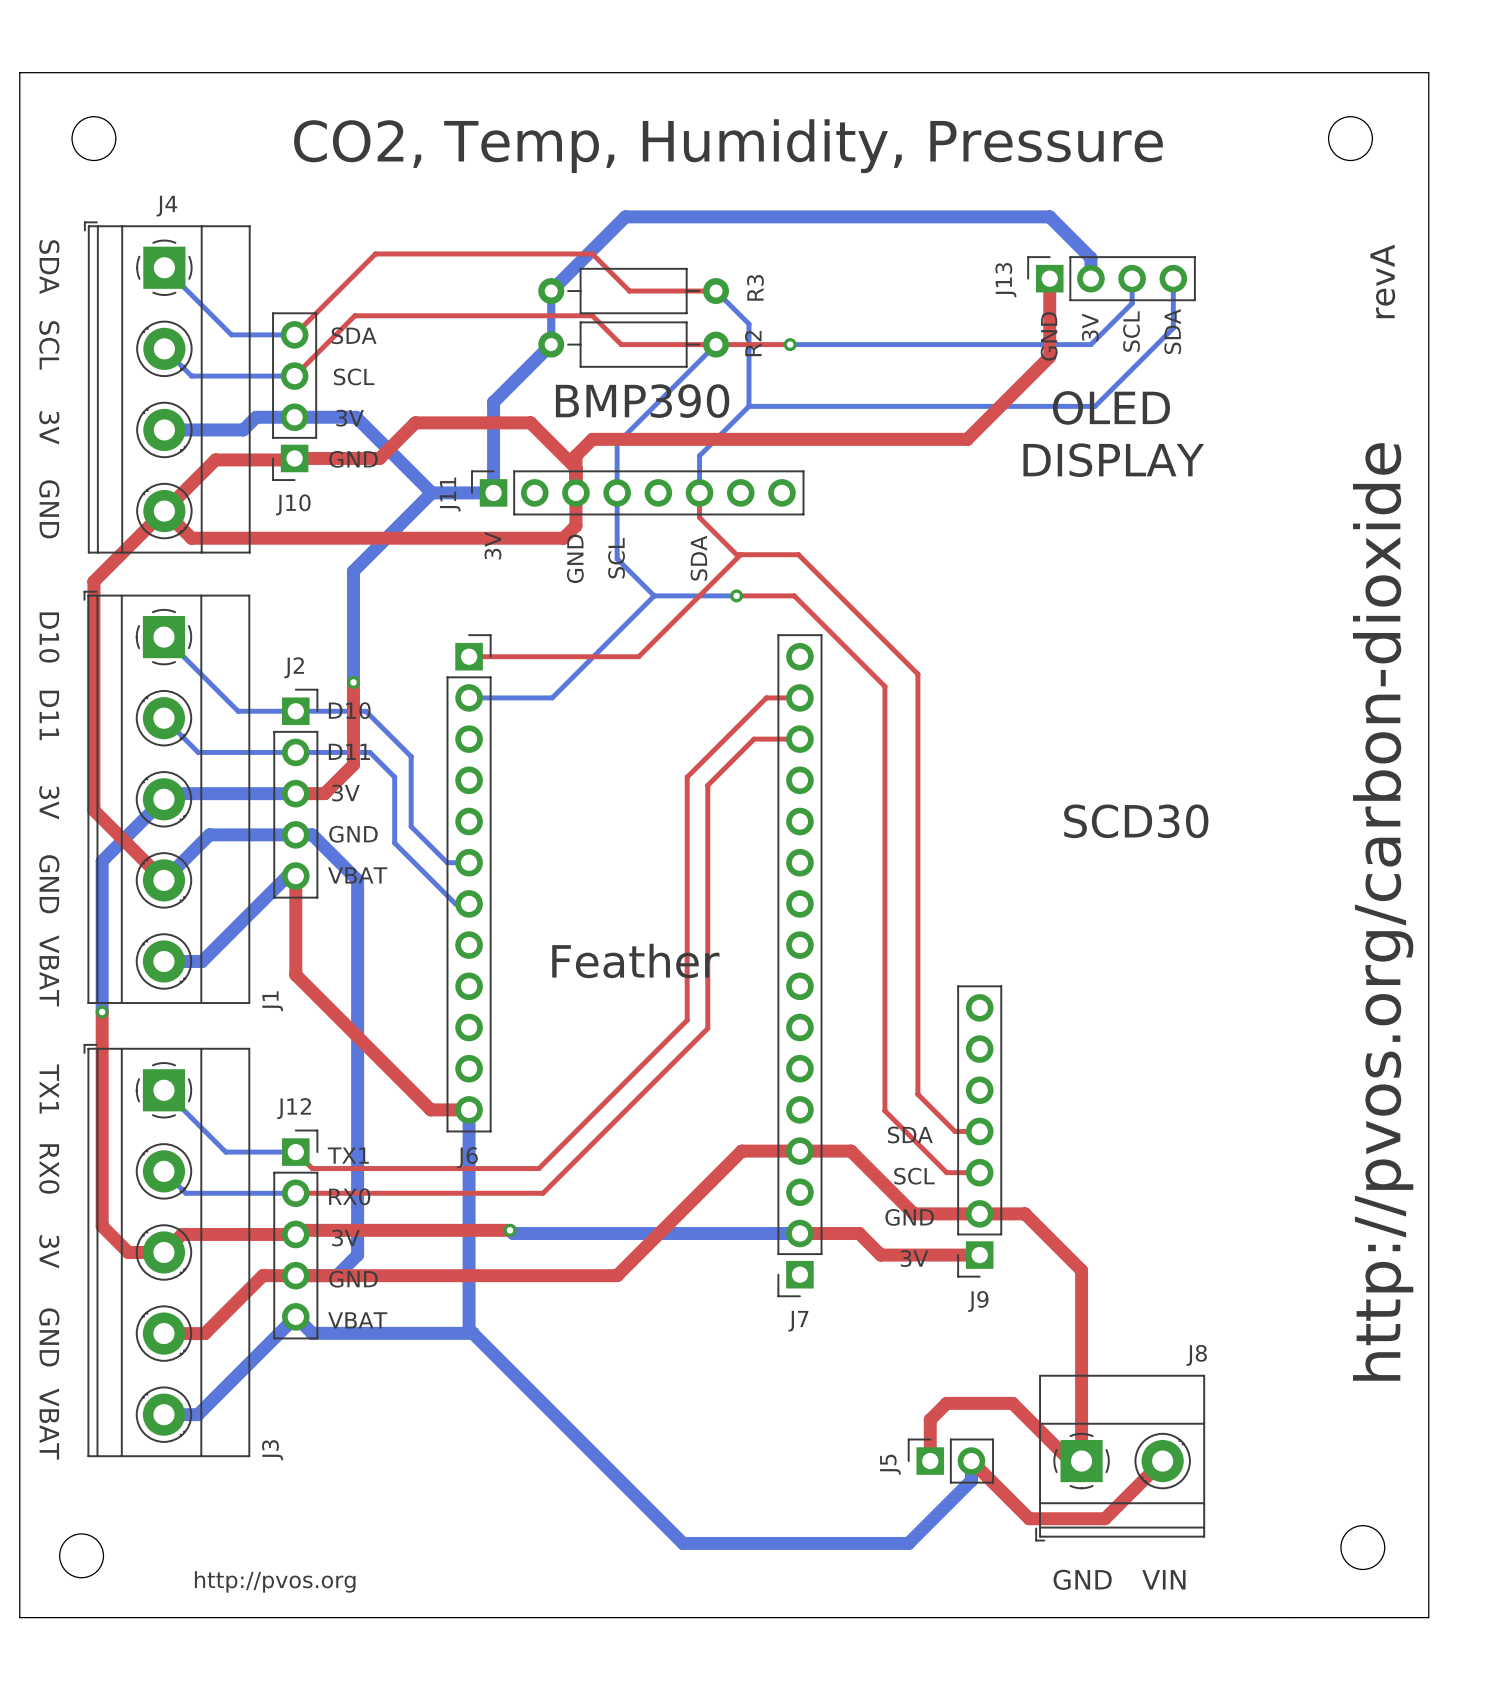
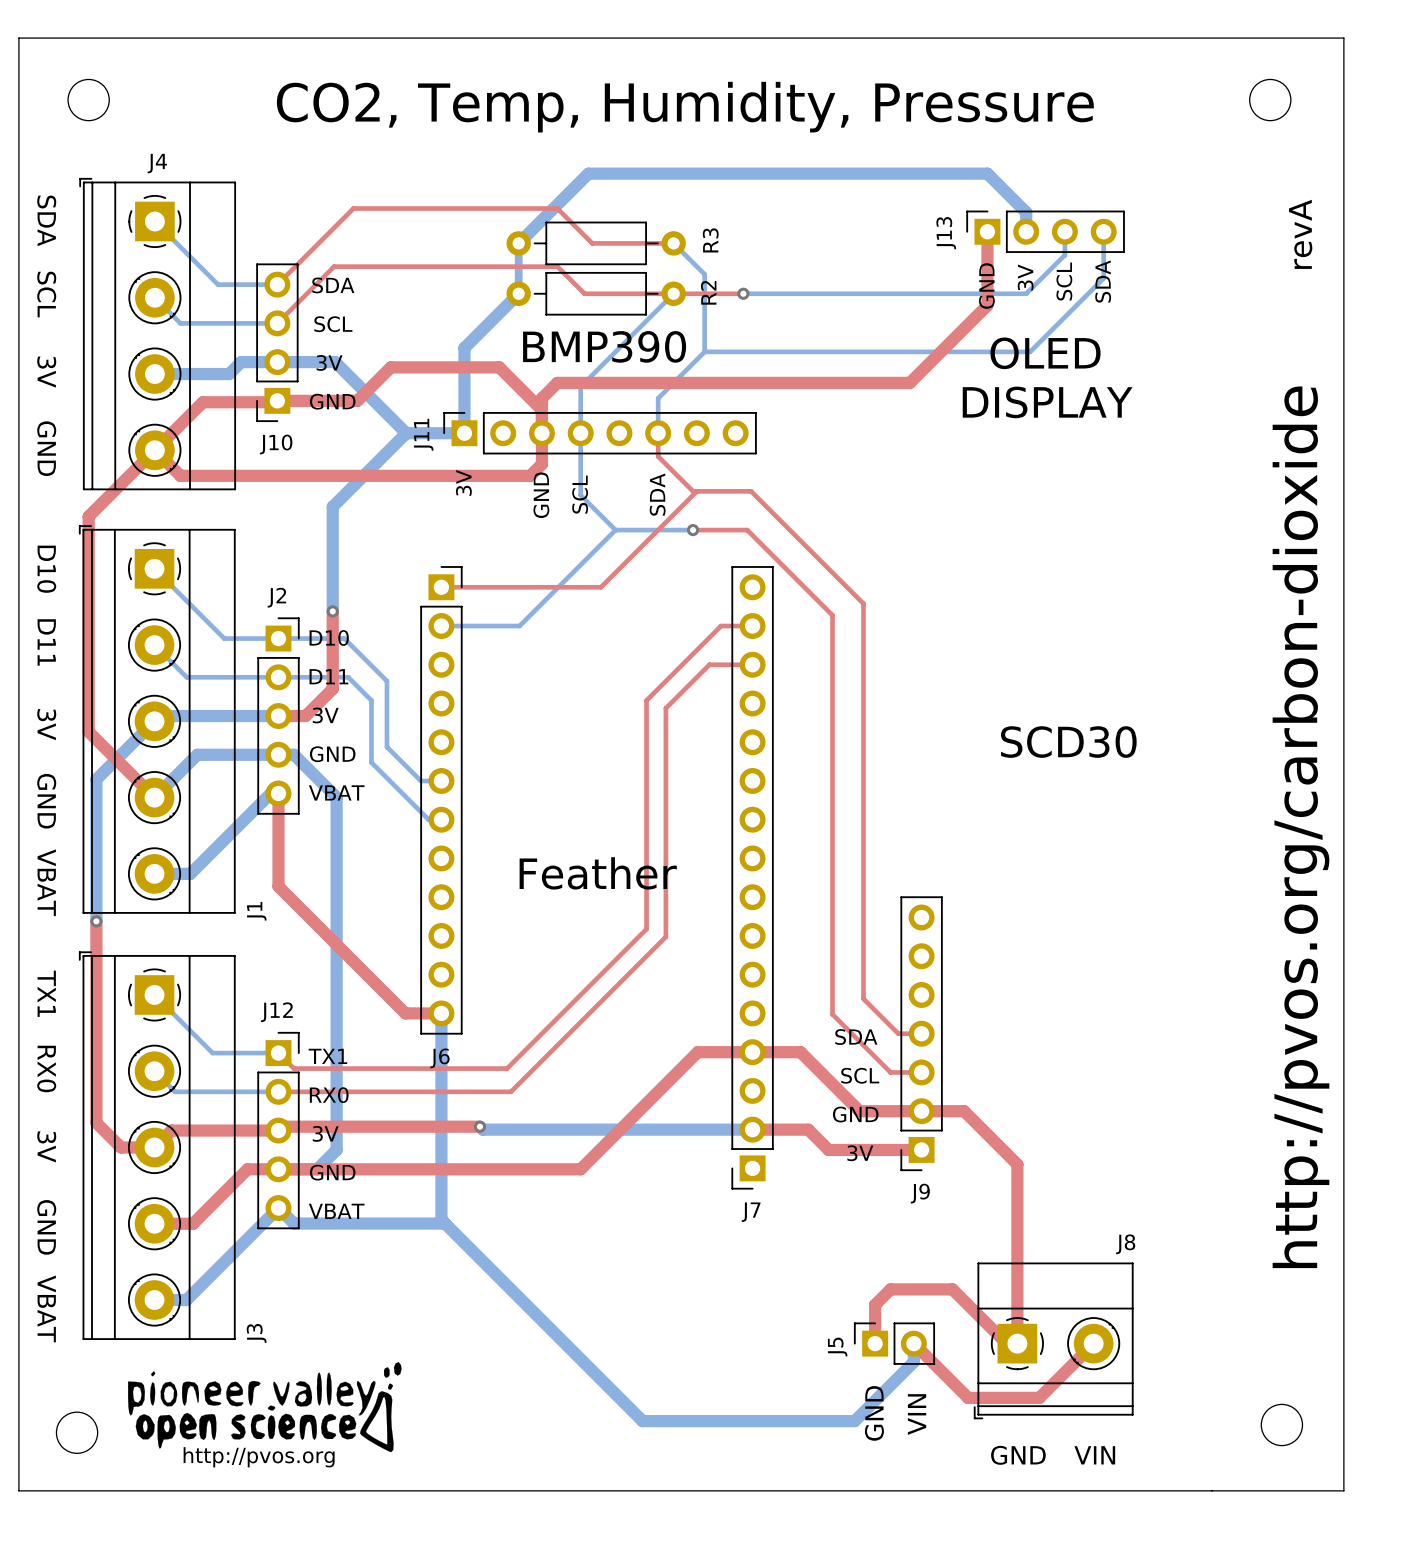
drawing: none -> [128, 1362, 402, 1453]
text: none -> GND (874, 1413)
text: none -> VIN (917, 1414)

